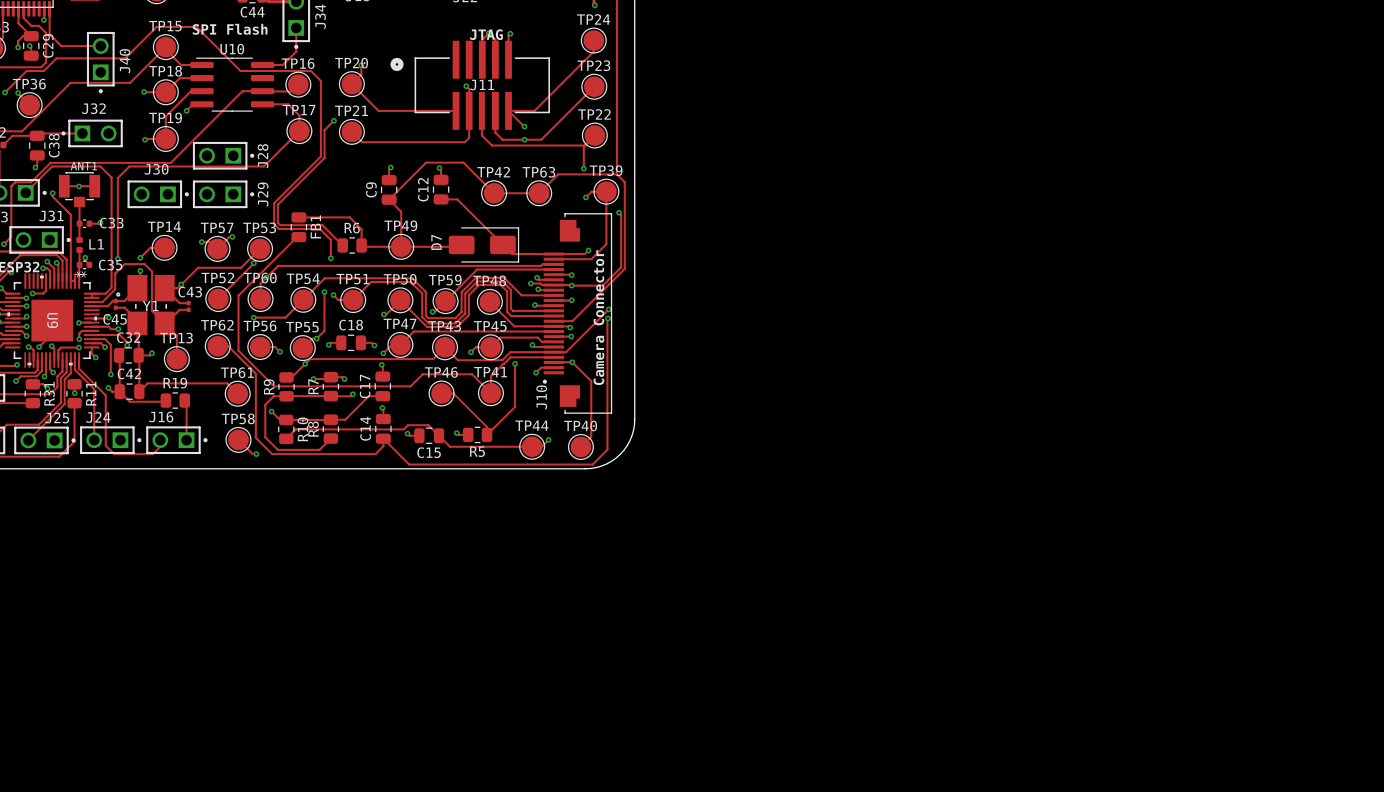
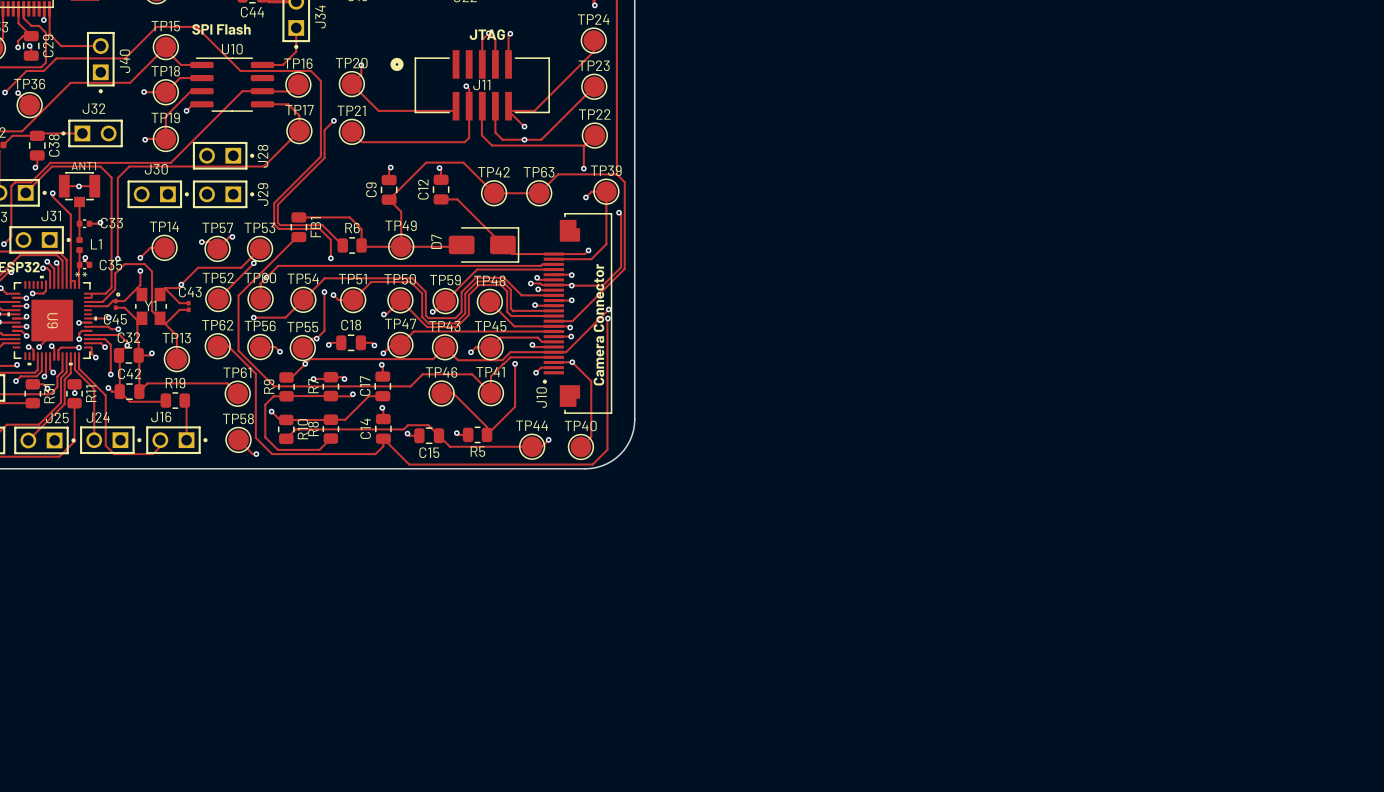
J11 footprint: [390, 40, 550, 130] -> [390, 50, 550, 121]
U9 footprint: [4, 273, 100, 368] -> [7, 275, 98, 366]
Y1 footprint: [116, 274, 175, 336] -> [116, 287, 168, 326]

